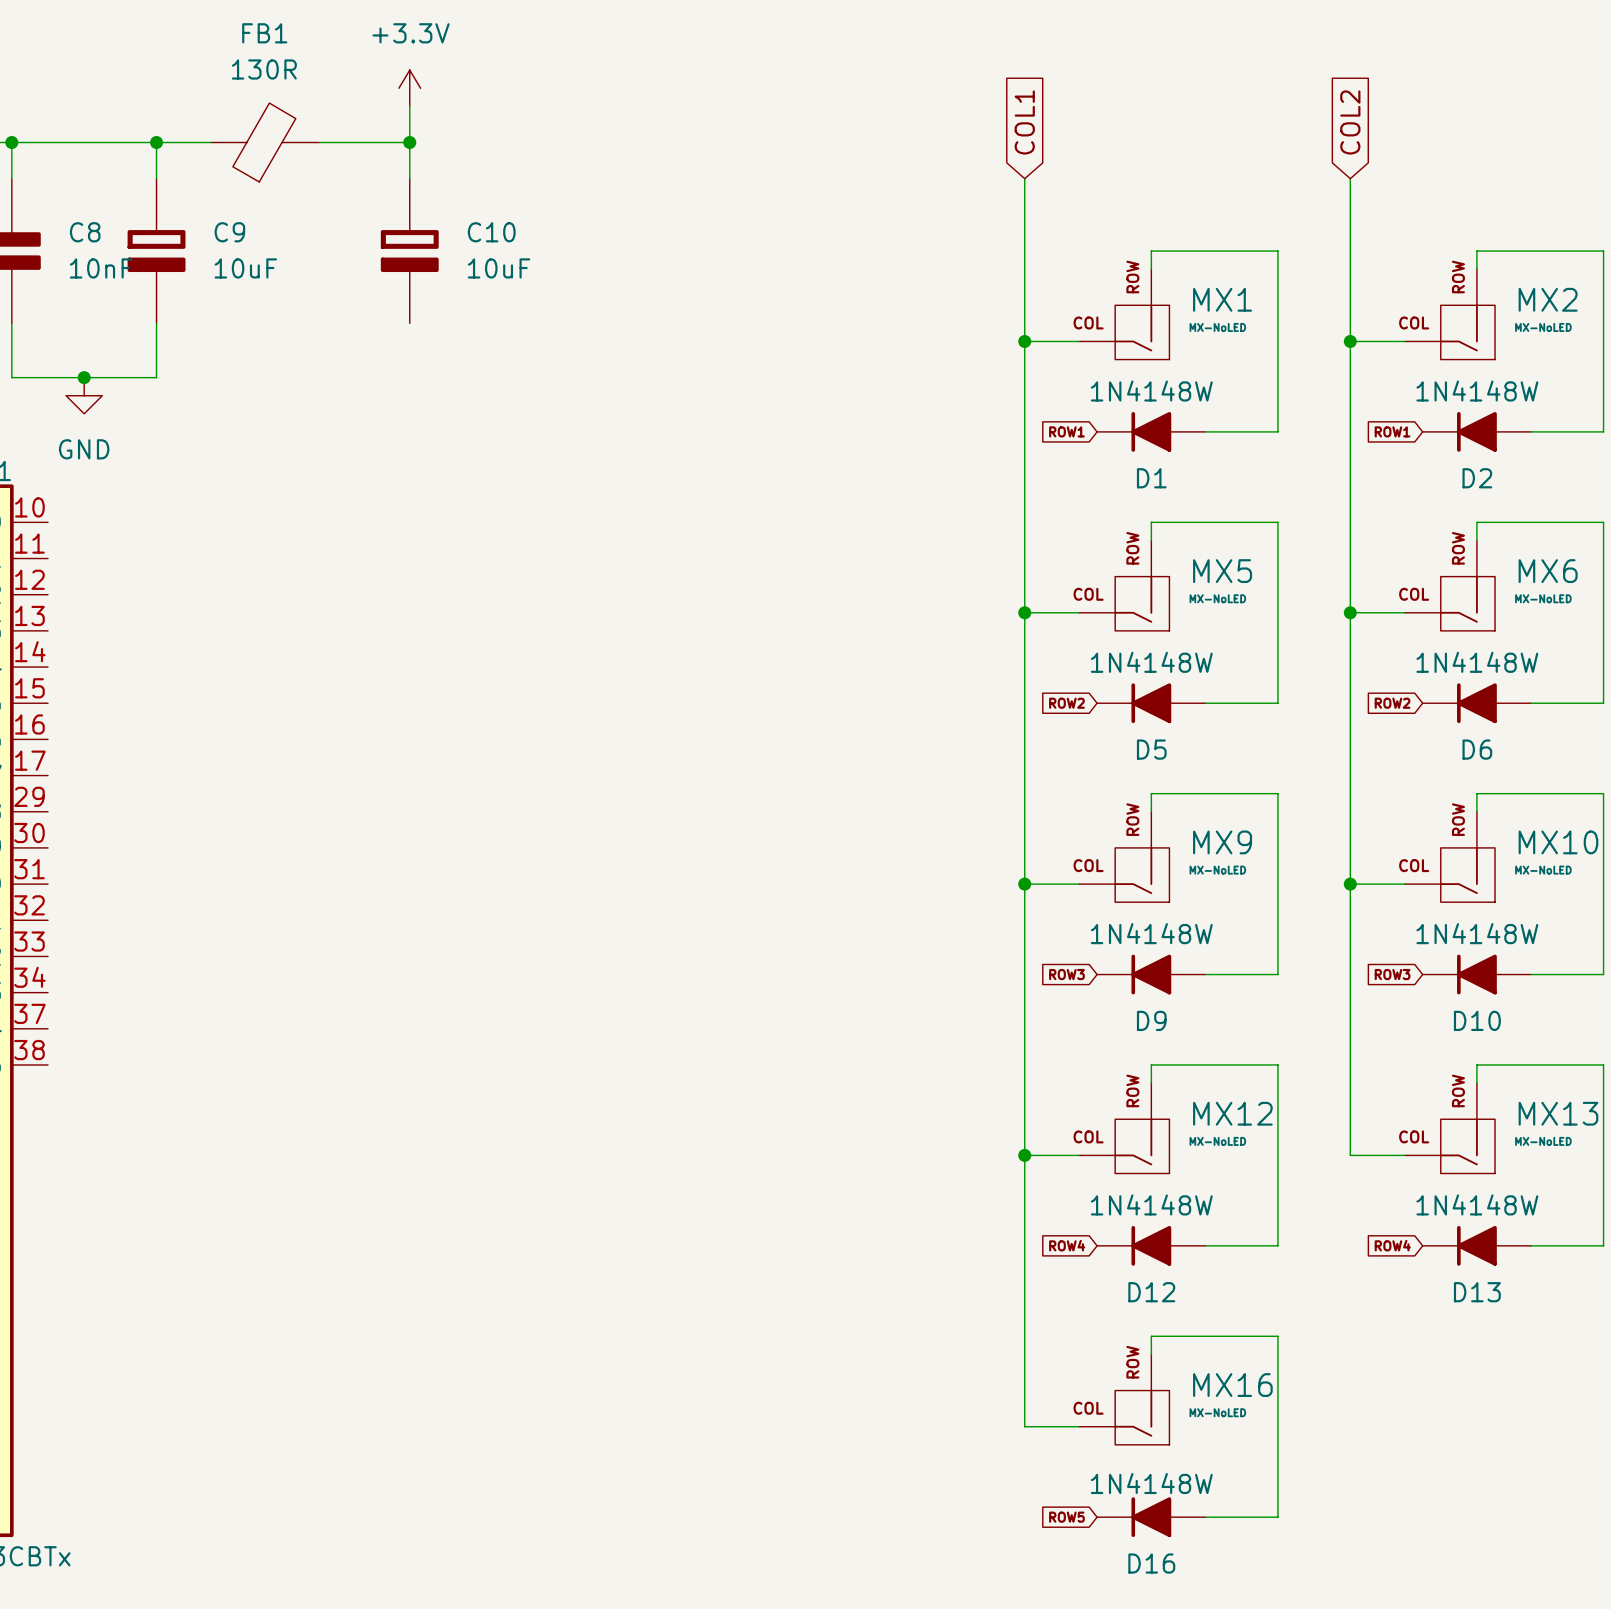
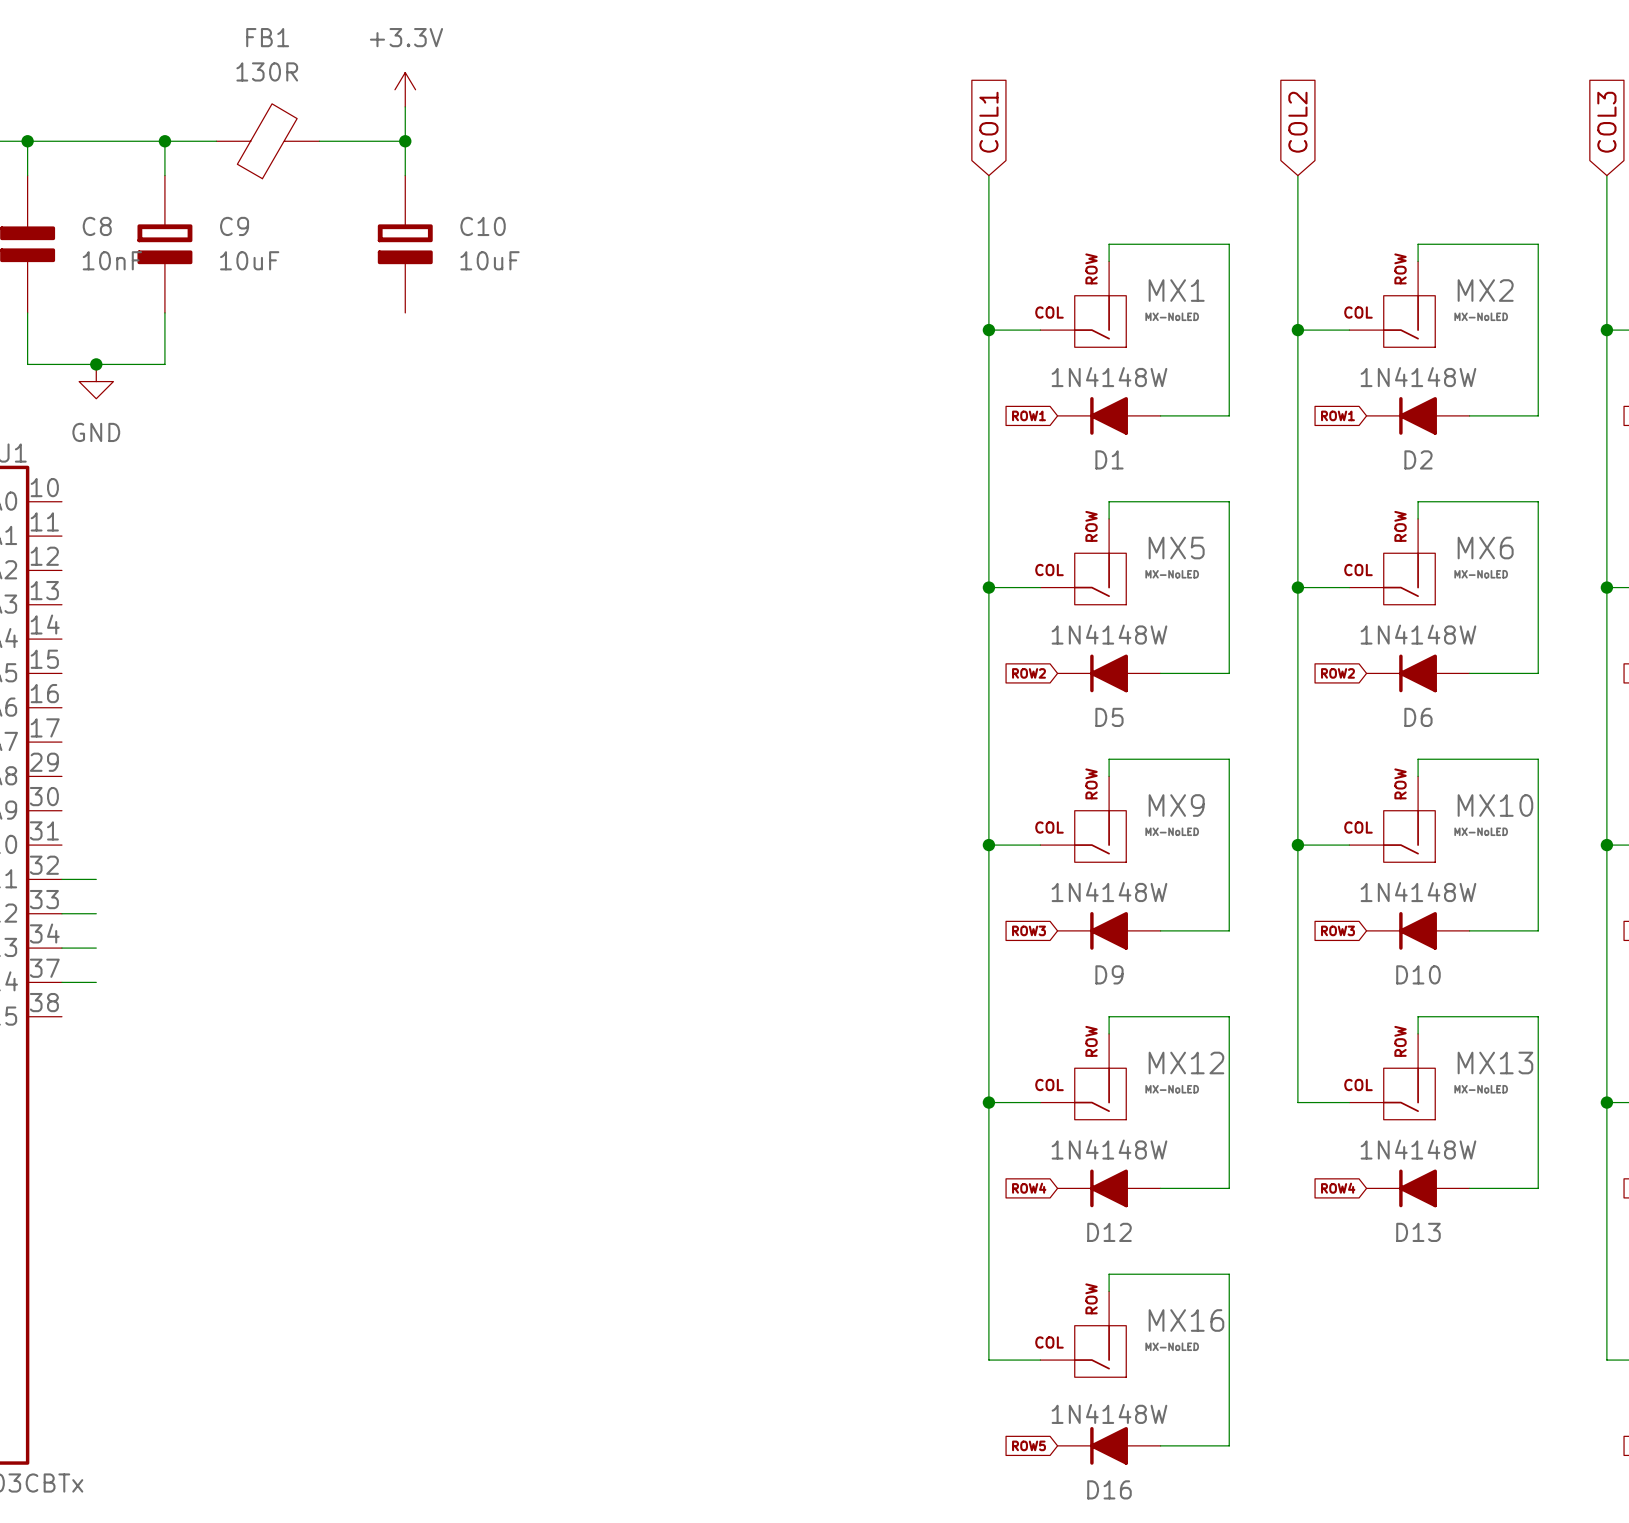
wire: none -> (61, 879) (96, 879)
wire: none -> (61, 913) (96, 913)
wire: none -> (61, 948) (96, 948)
wire: none -> (61, 982) (96, 982)

